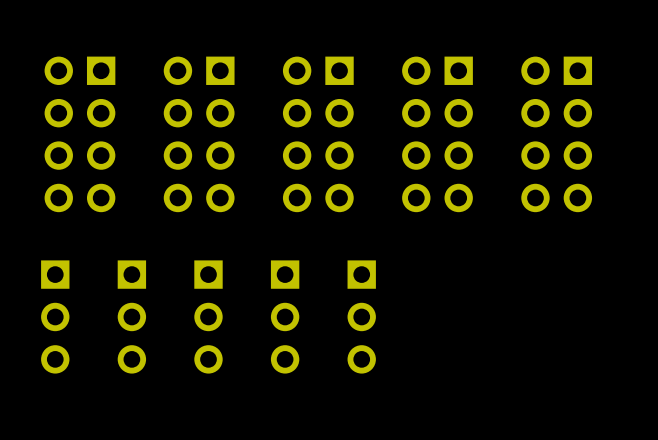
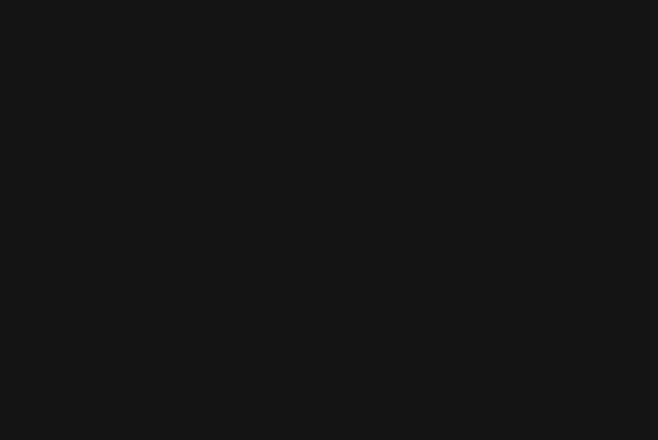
part: (79, 134) -> none
part: (199, 134) -> none
part: (318, 134) -> none
part: (437, 134) -> none
part: (556, 134) -> none
part: (55, 316) -> none
part: (131, 316) -> none
part: (208, 316) -> none
part: (285, 316) -> none
part: (361, 316) -> none

